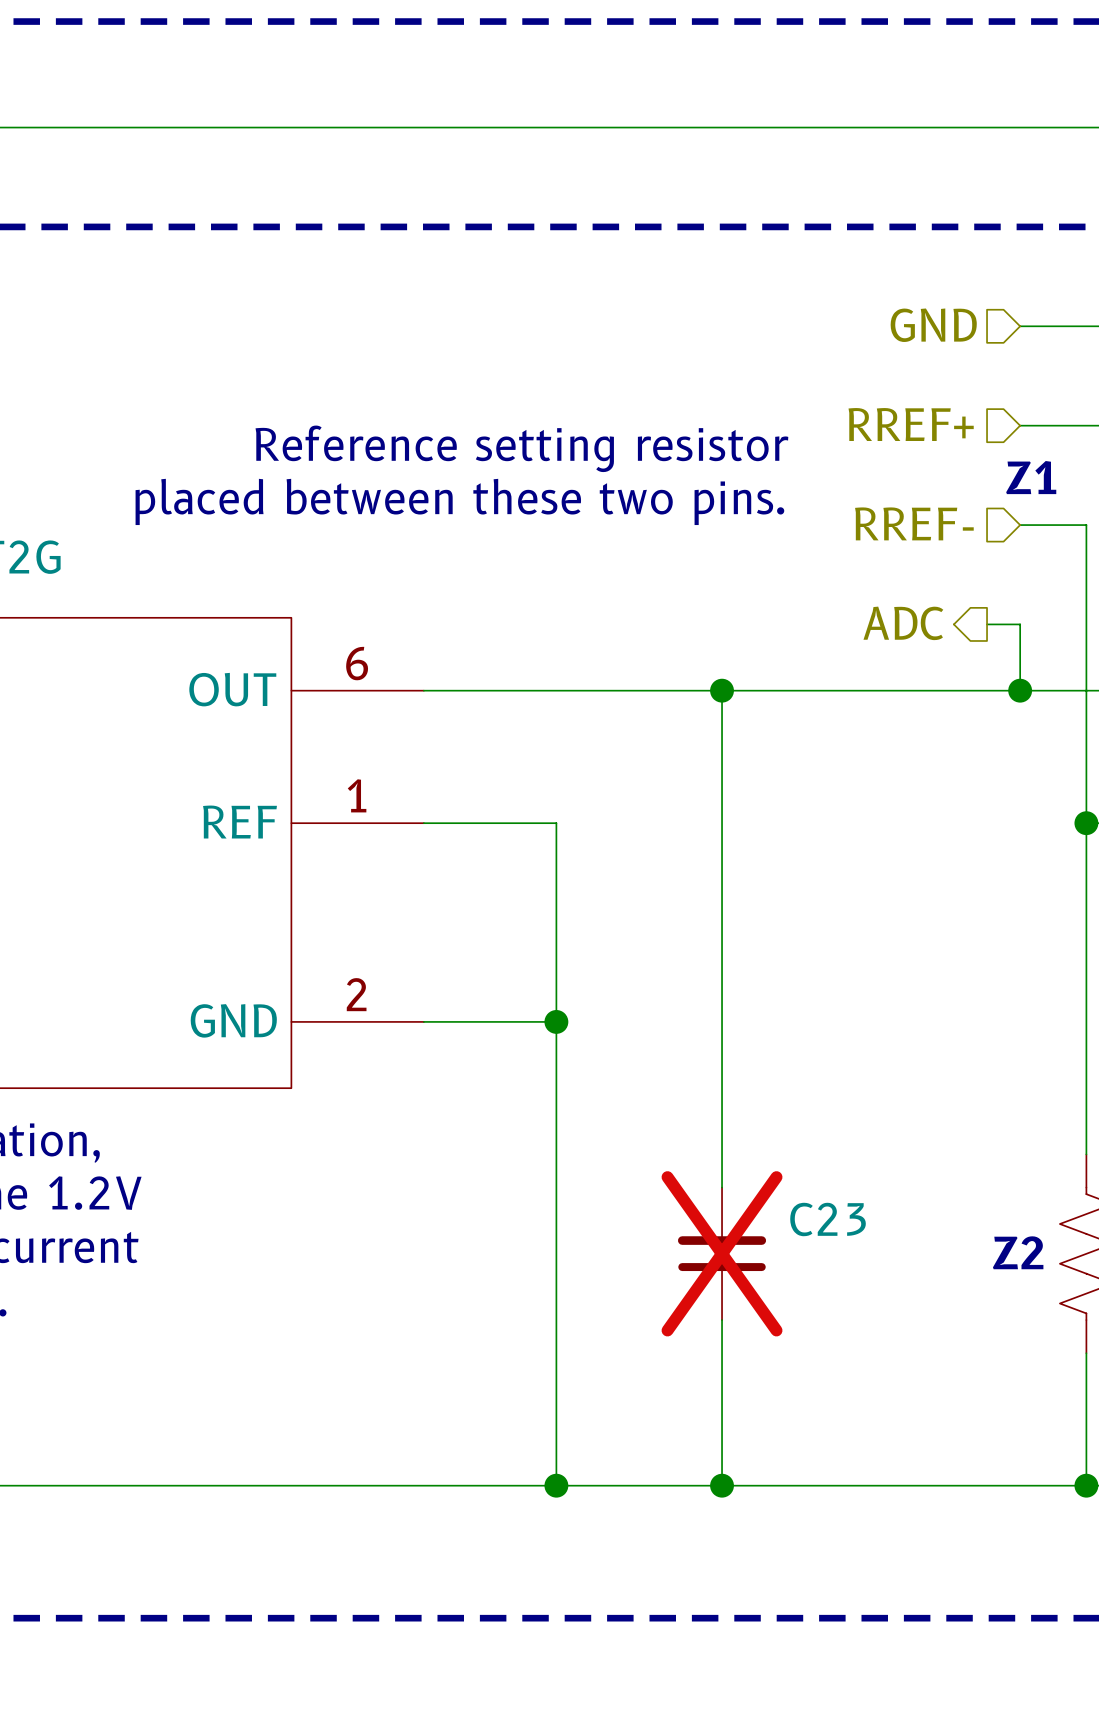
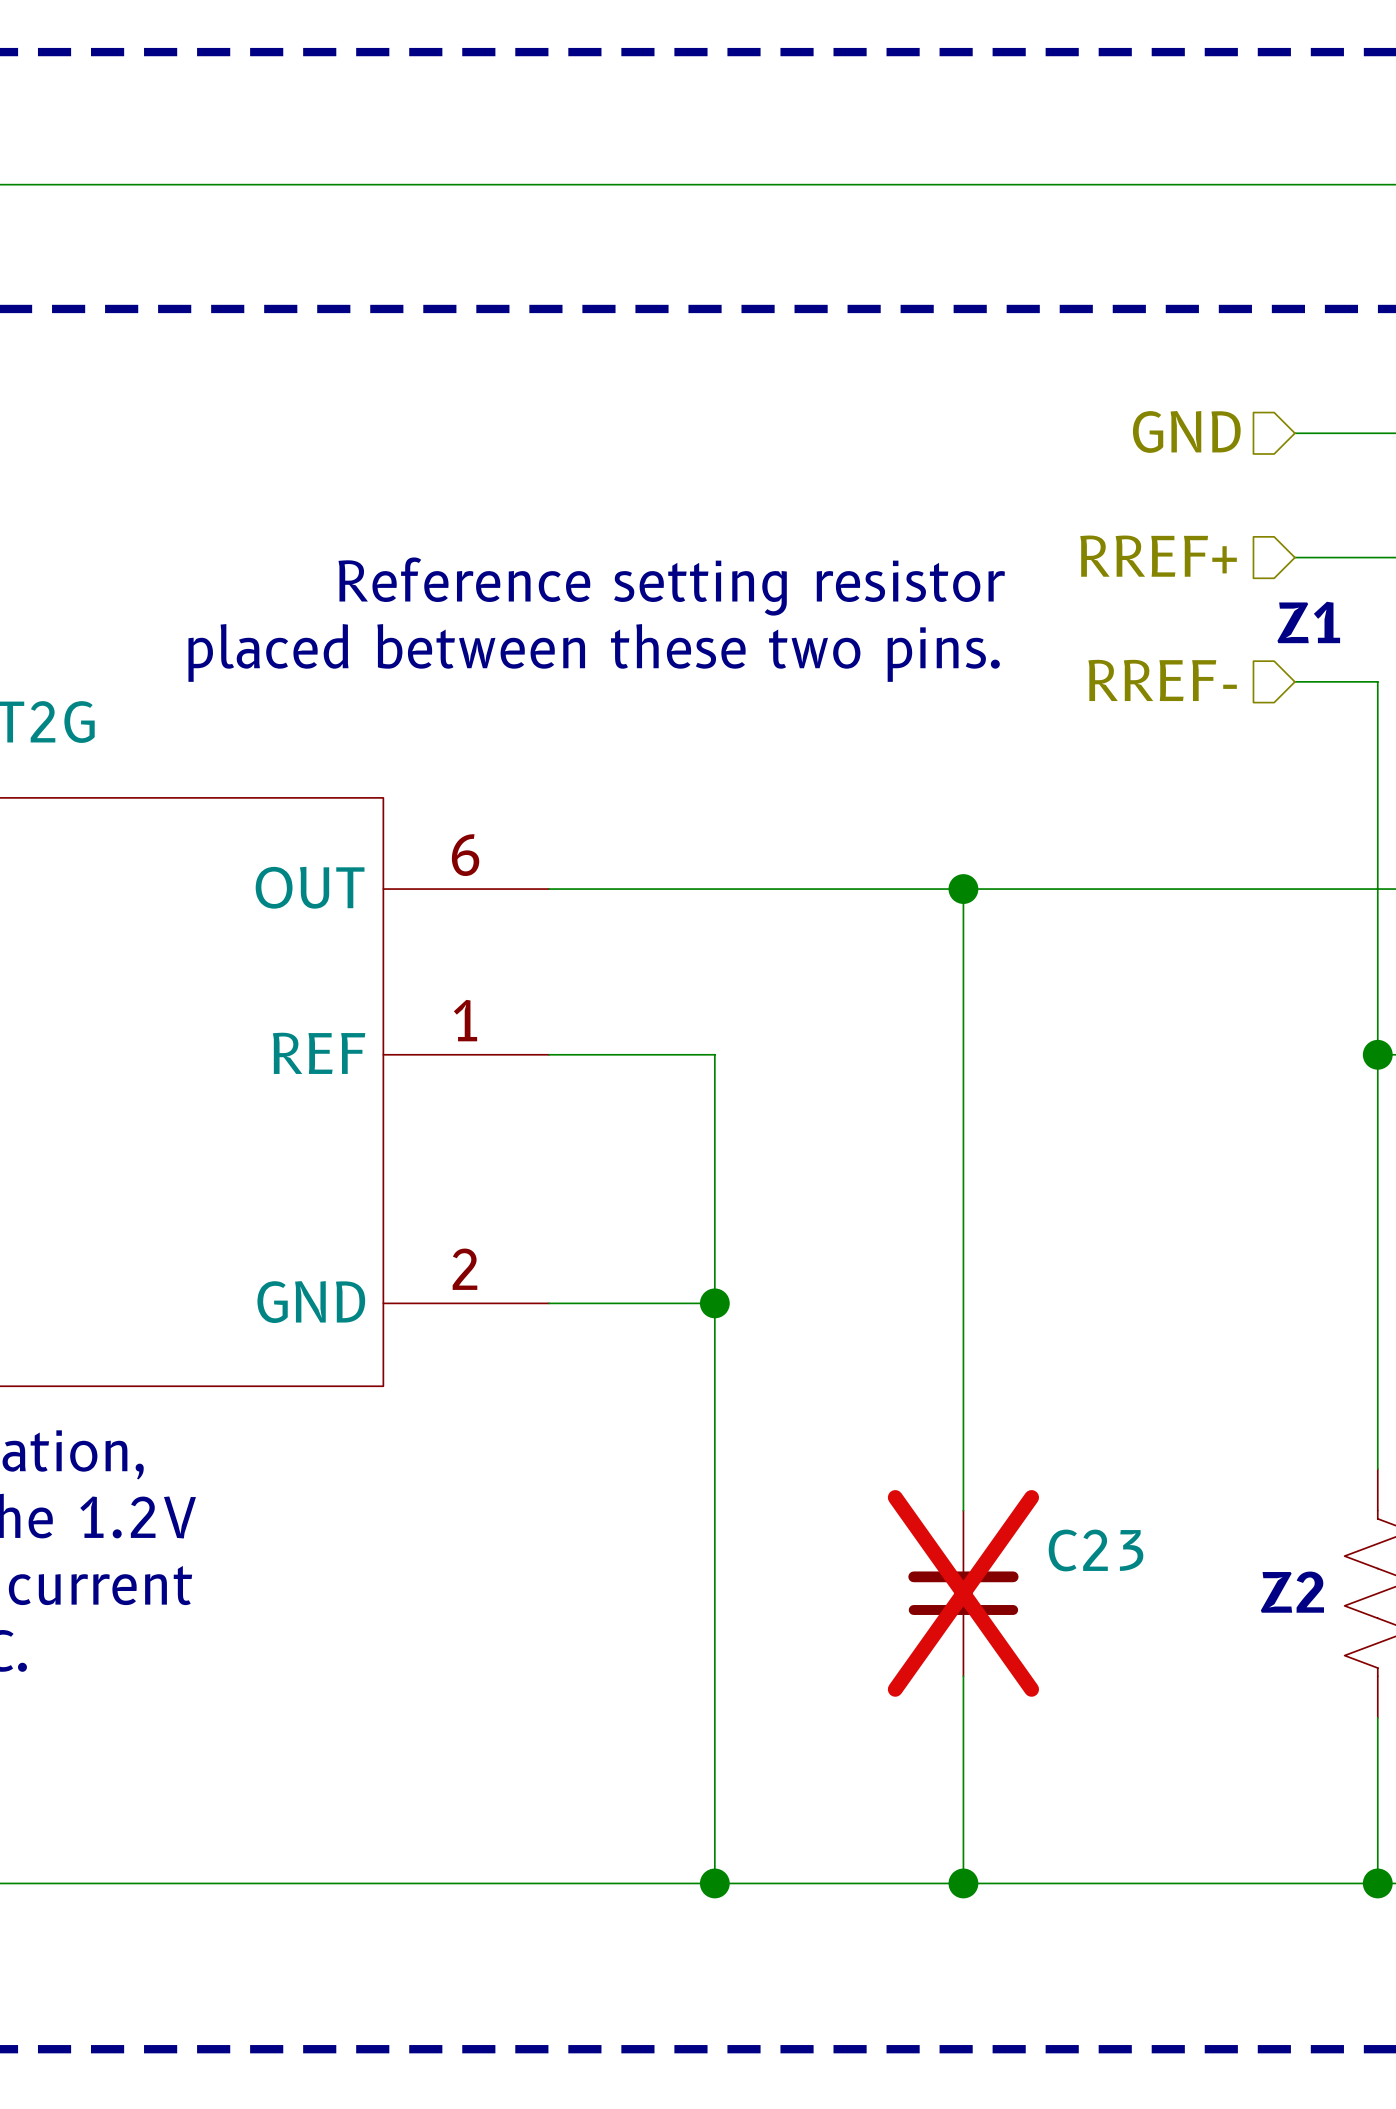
hierarchical label: ADC (903, 623) -> none
wire: (987, 624) (1020, 624) (1020, 690) -> none
wire: (722, 690) (722, 1187) -> (963, 889) (963, 1510)
junction position: (722, 690) -> (963, 889)
junction: (1020, 690) -> none
C23 position: (722, 1253) -> (963, 1593)
wire: (722, 1320) (722, 1485) -> (963, 1676) (963, 1883)
junction position: (722, 1485) -> (963, 1883)

